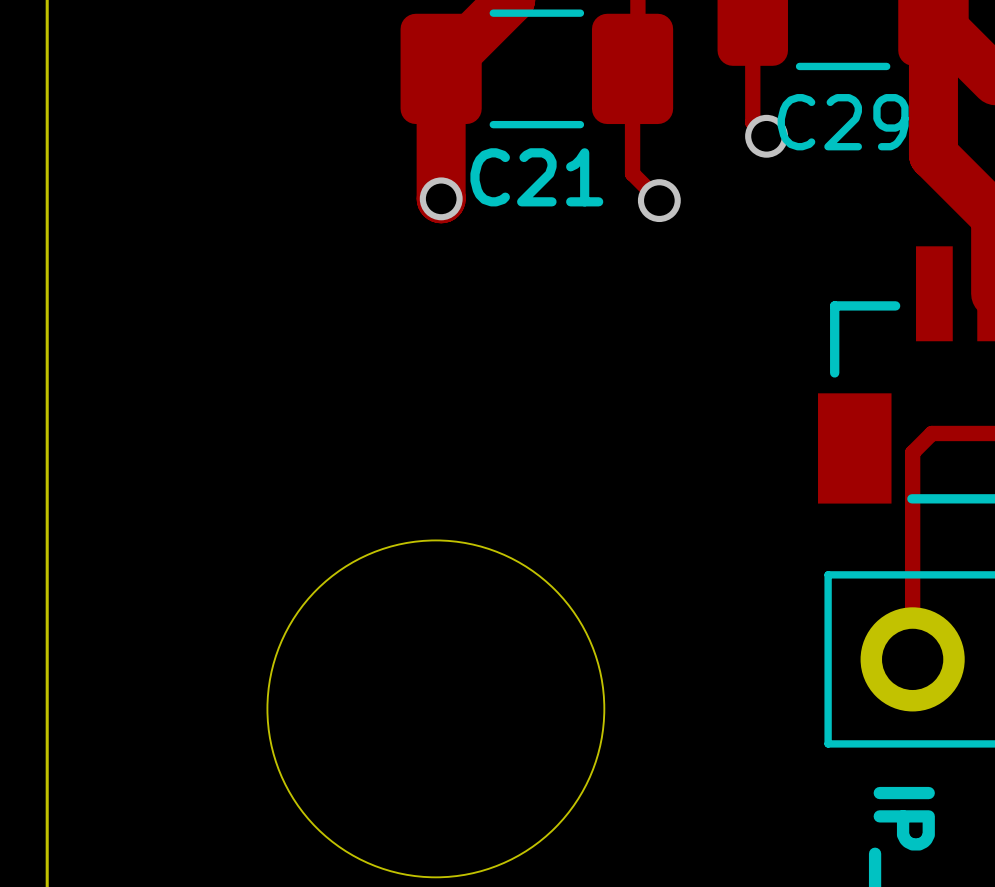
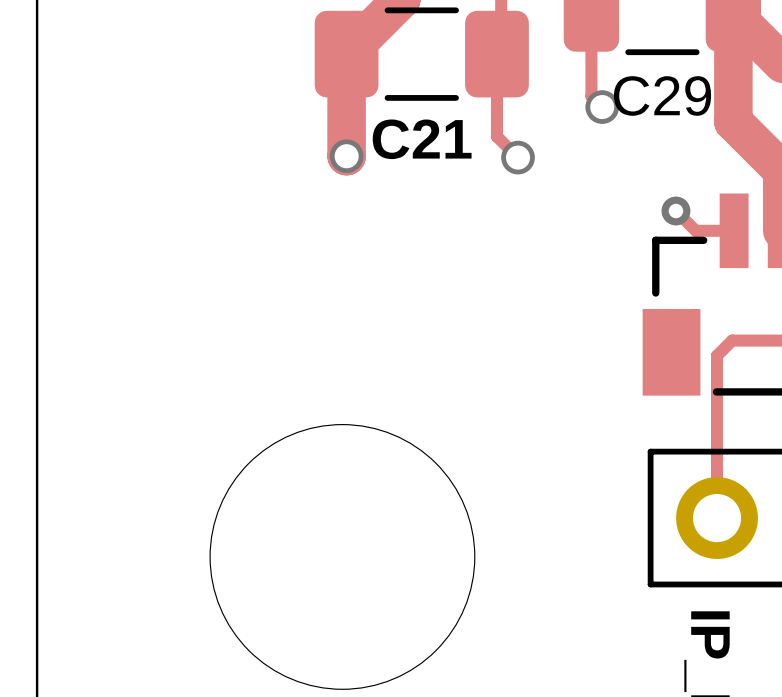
track: none -> (675, 211) (695, 230) (734, 230)
via: none -> (675, 211)

